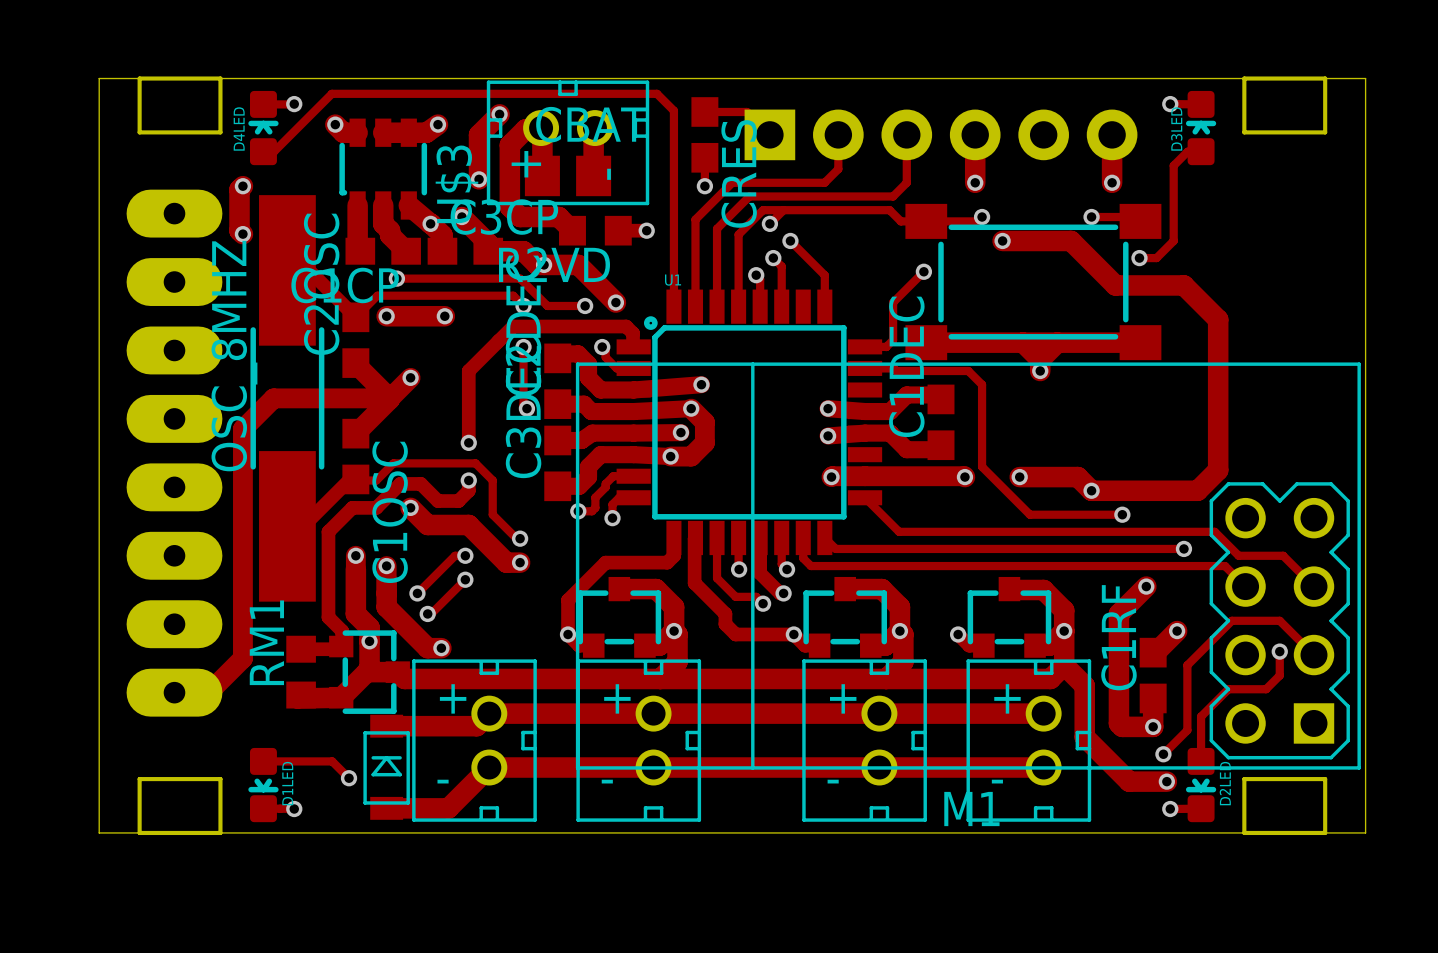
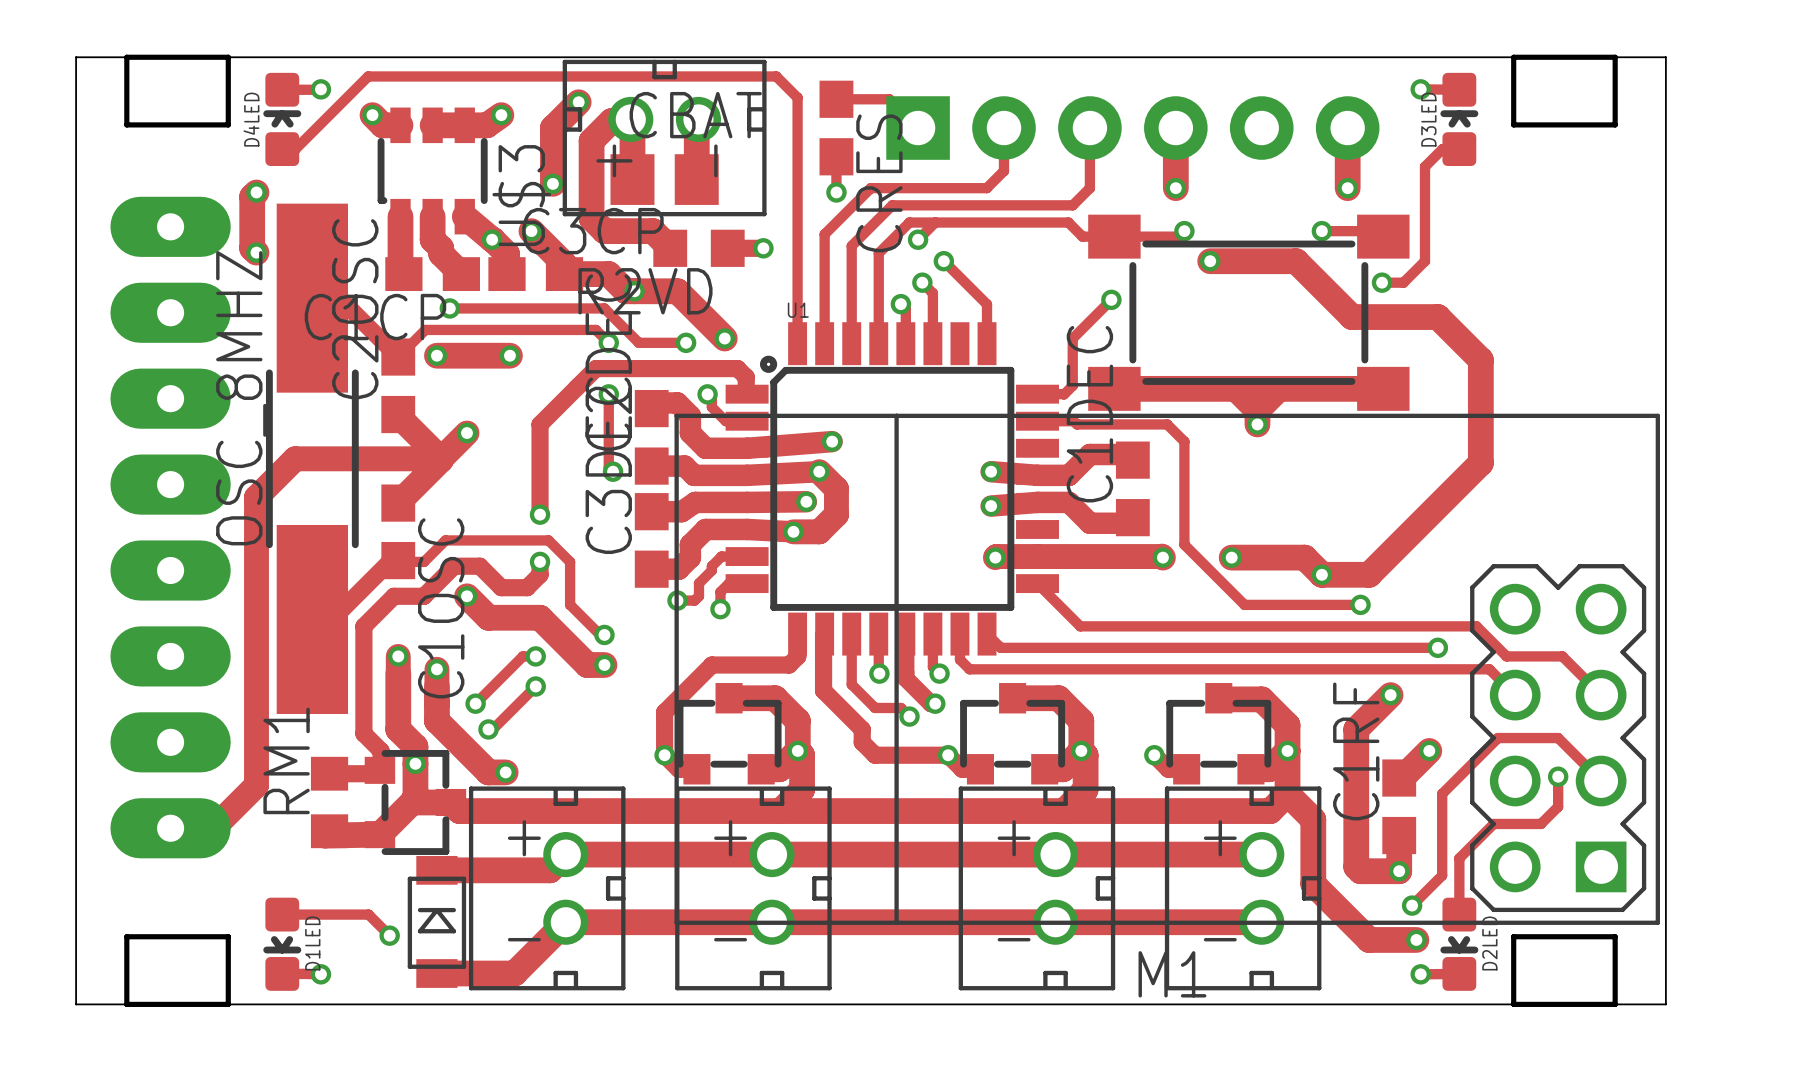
track: (1218, 401) (1218, 470) (1197, 490) (1129, 490) -> (1480, 463) (1369, 574)

